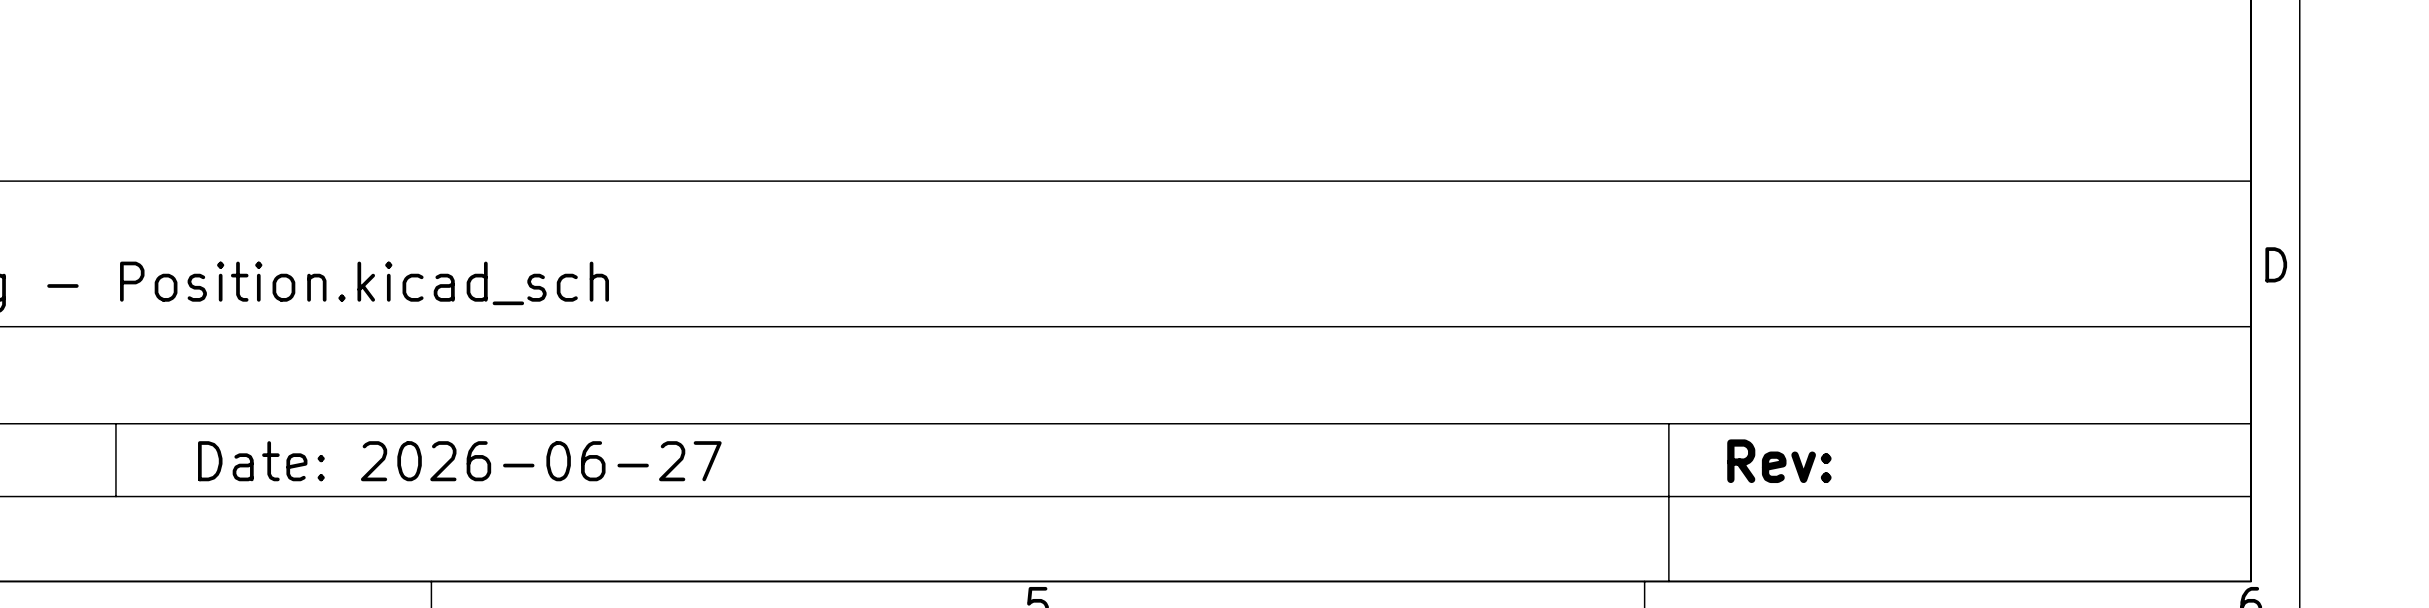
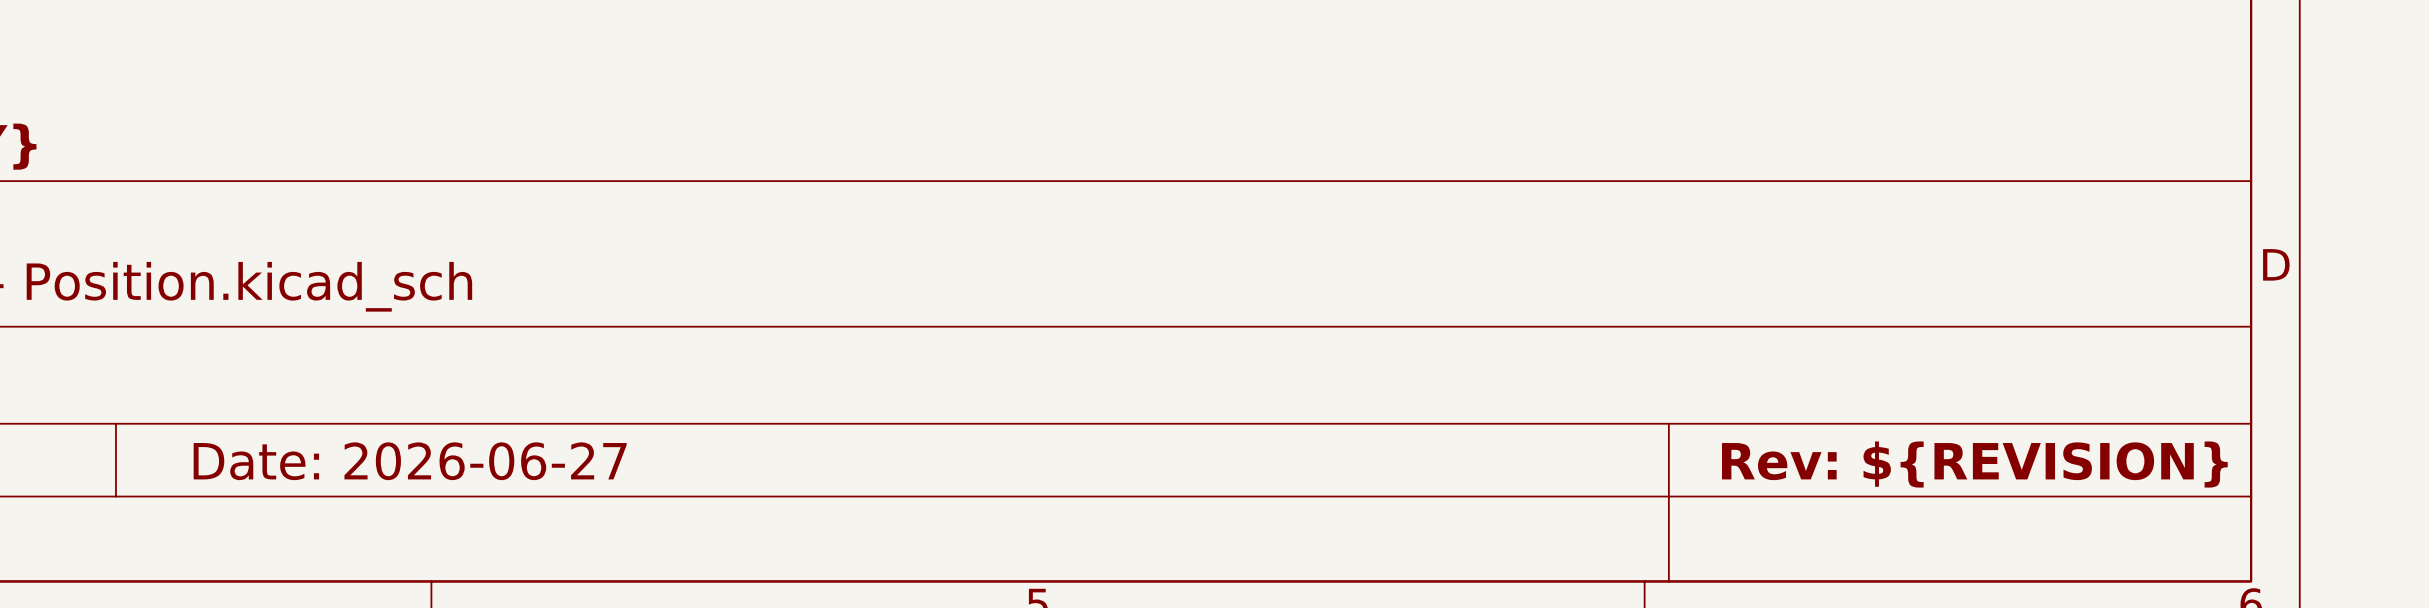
title block: Rev: (1779, 461) -> Rev: ${REVISION} (1974, 464)

